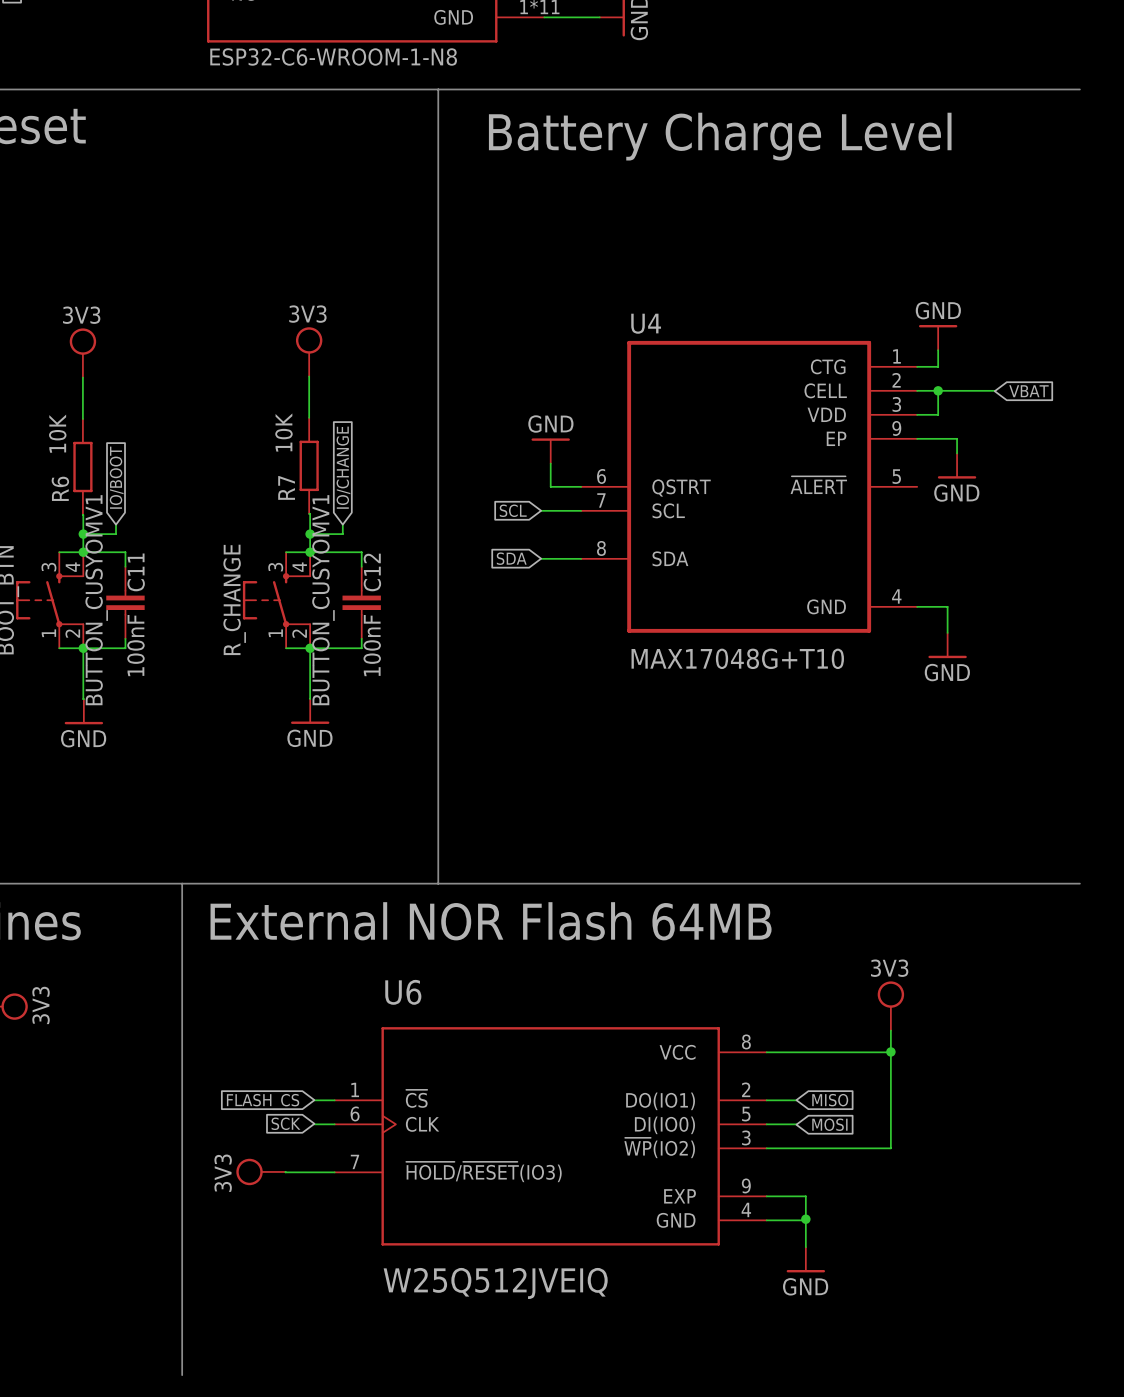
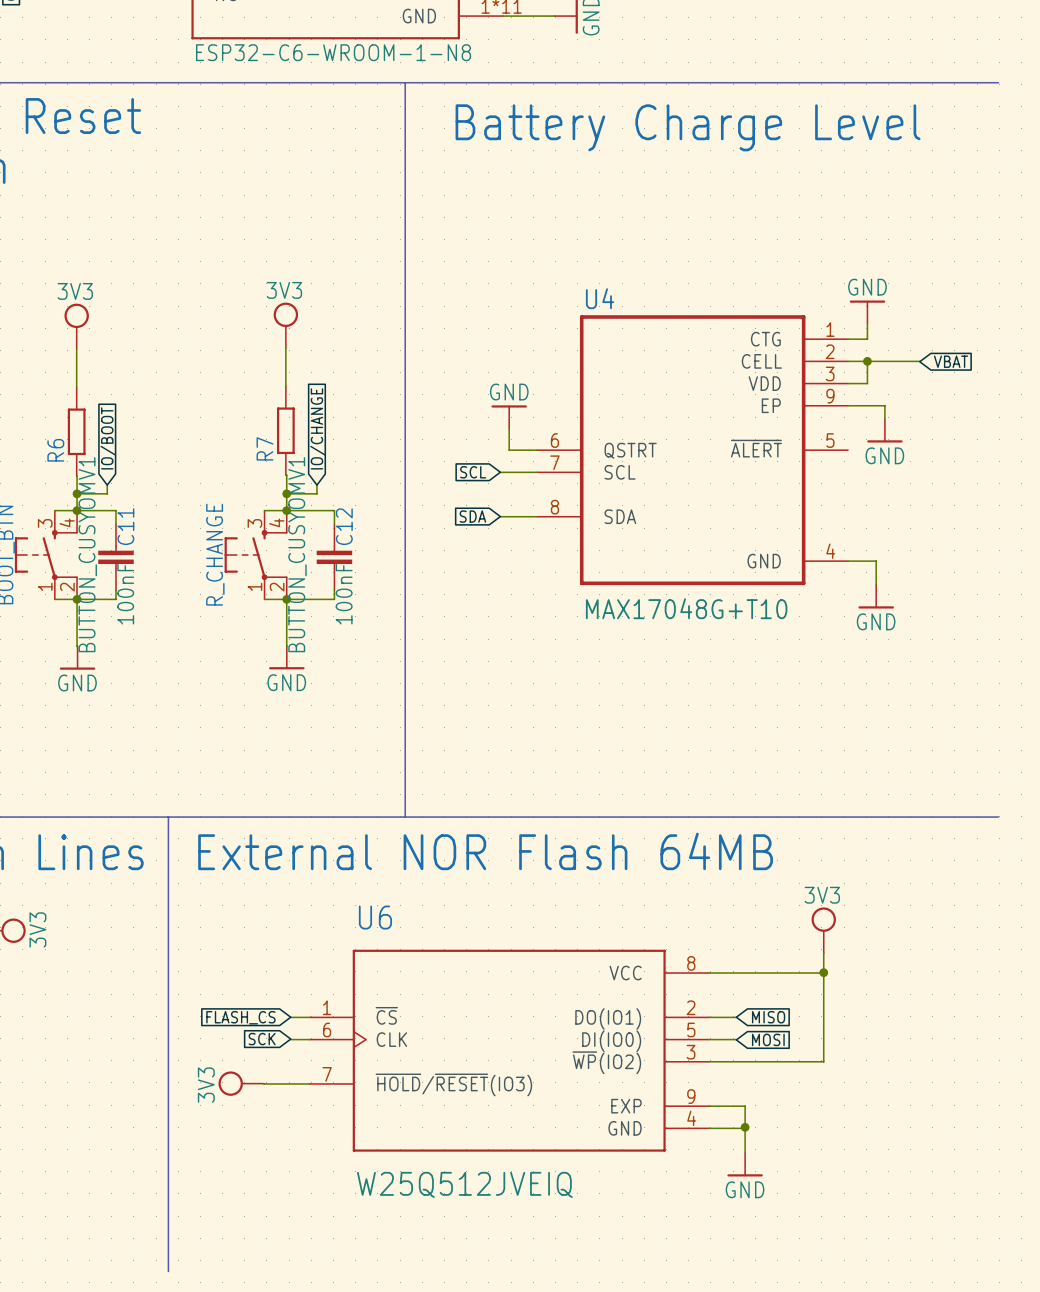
R7 value: 10K (283, 432) -> none
R6 value: 10K (57, 433) -> none

